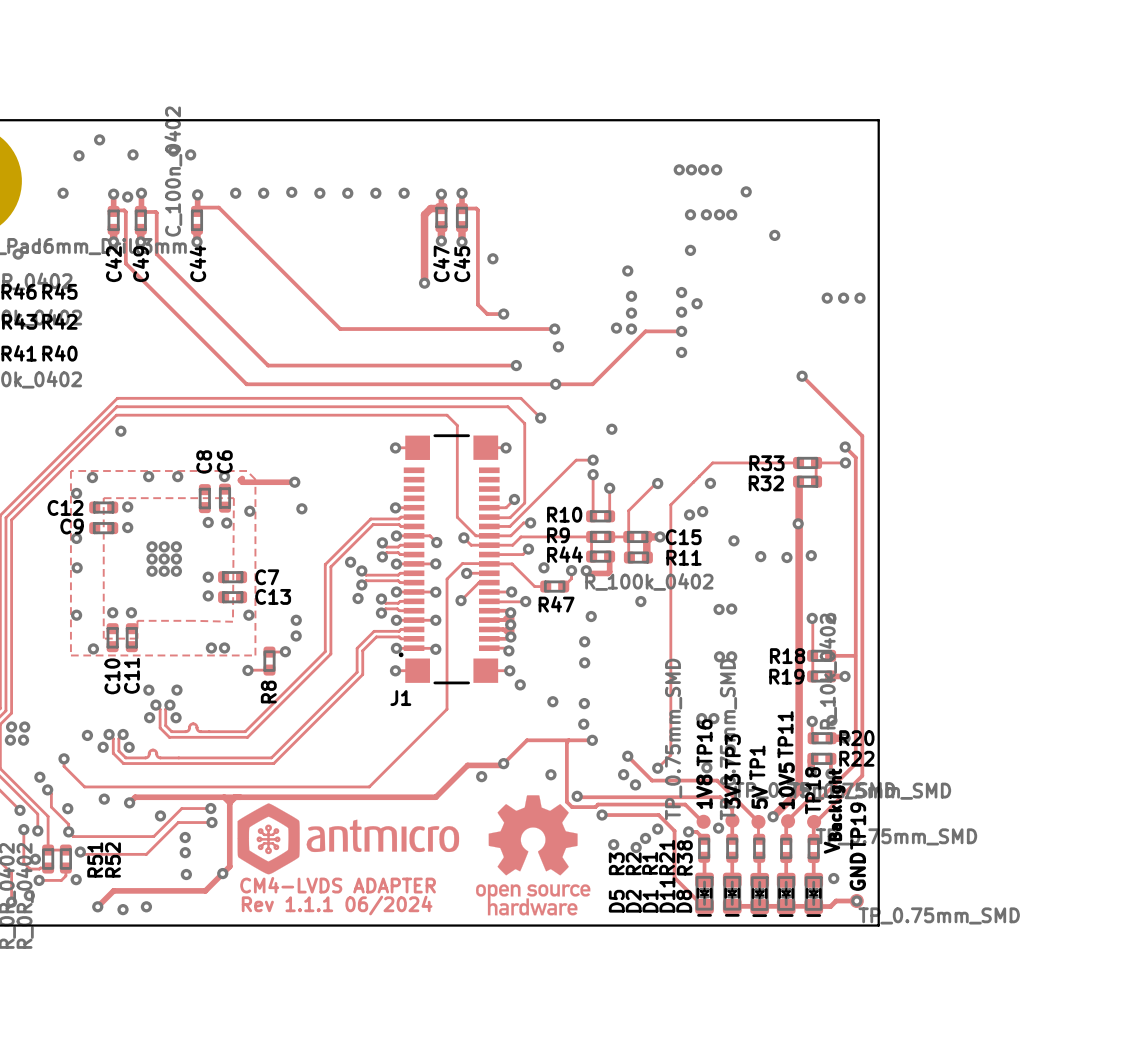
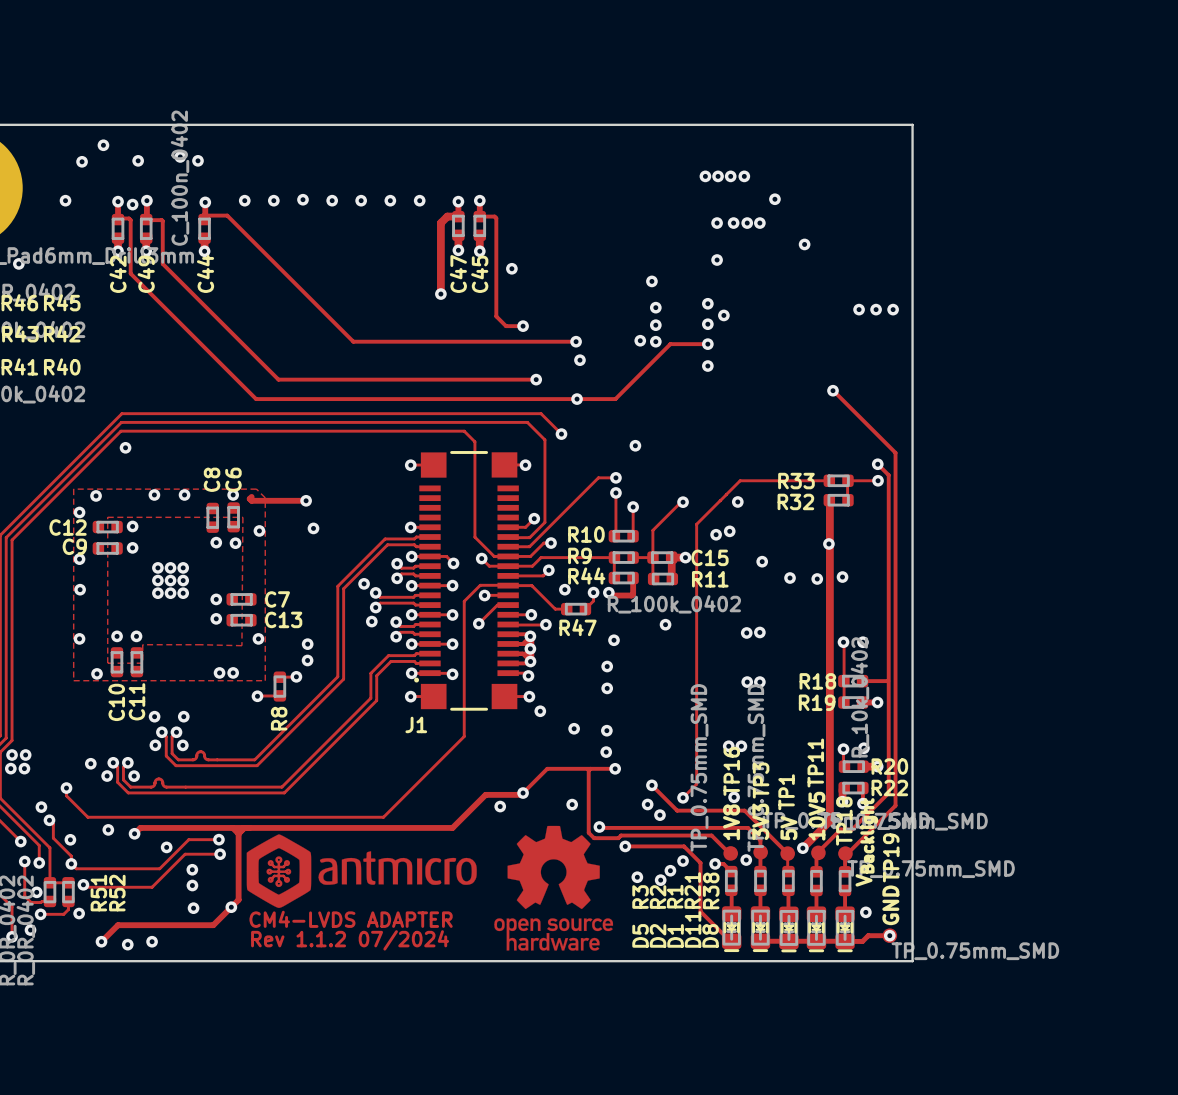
text: Rev 1.1.1 06/2024 (337, 905) -> Rev 1.1.2 07/2024 (350, 940)

